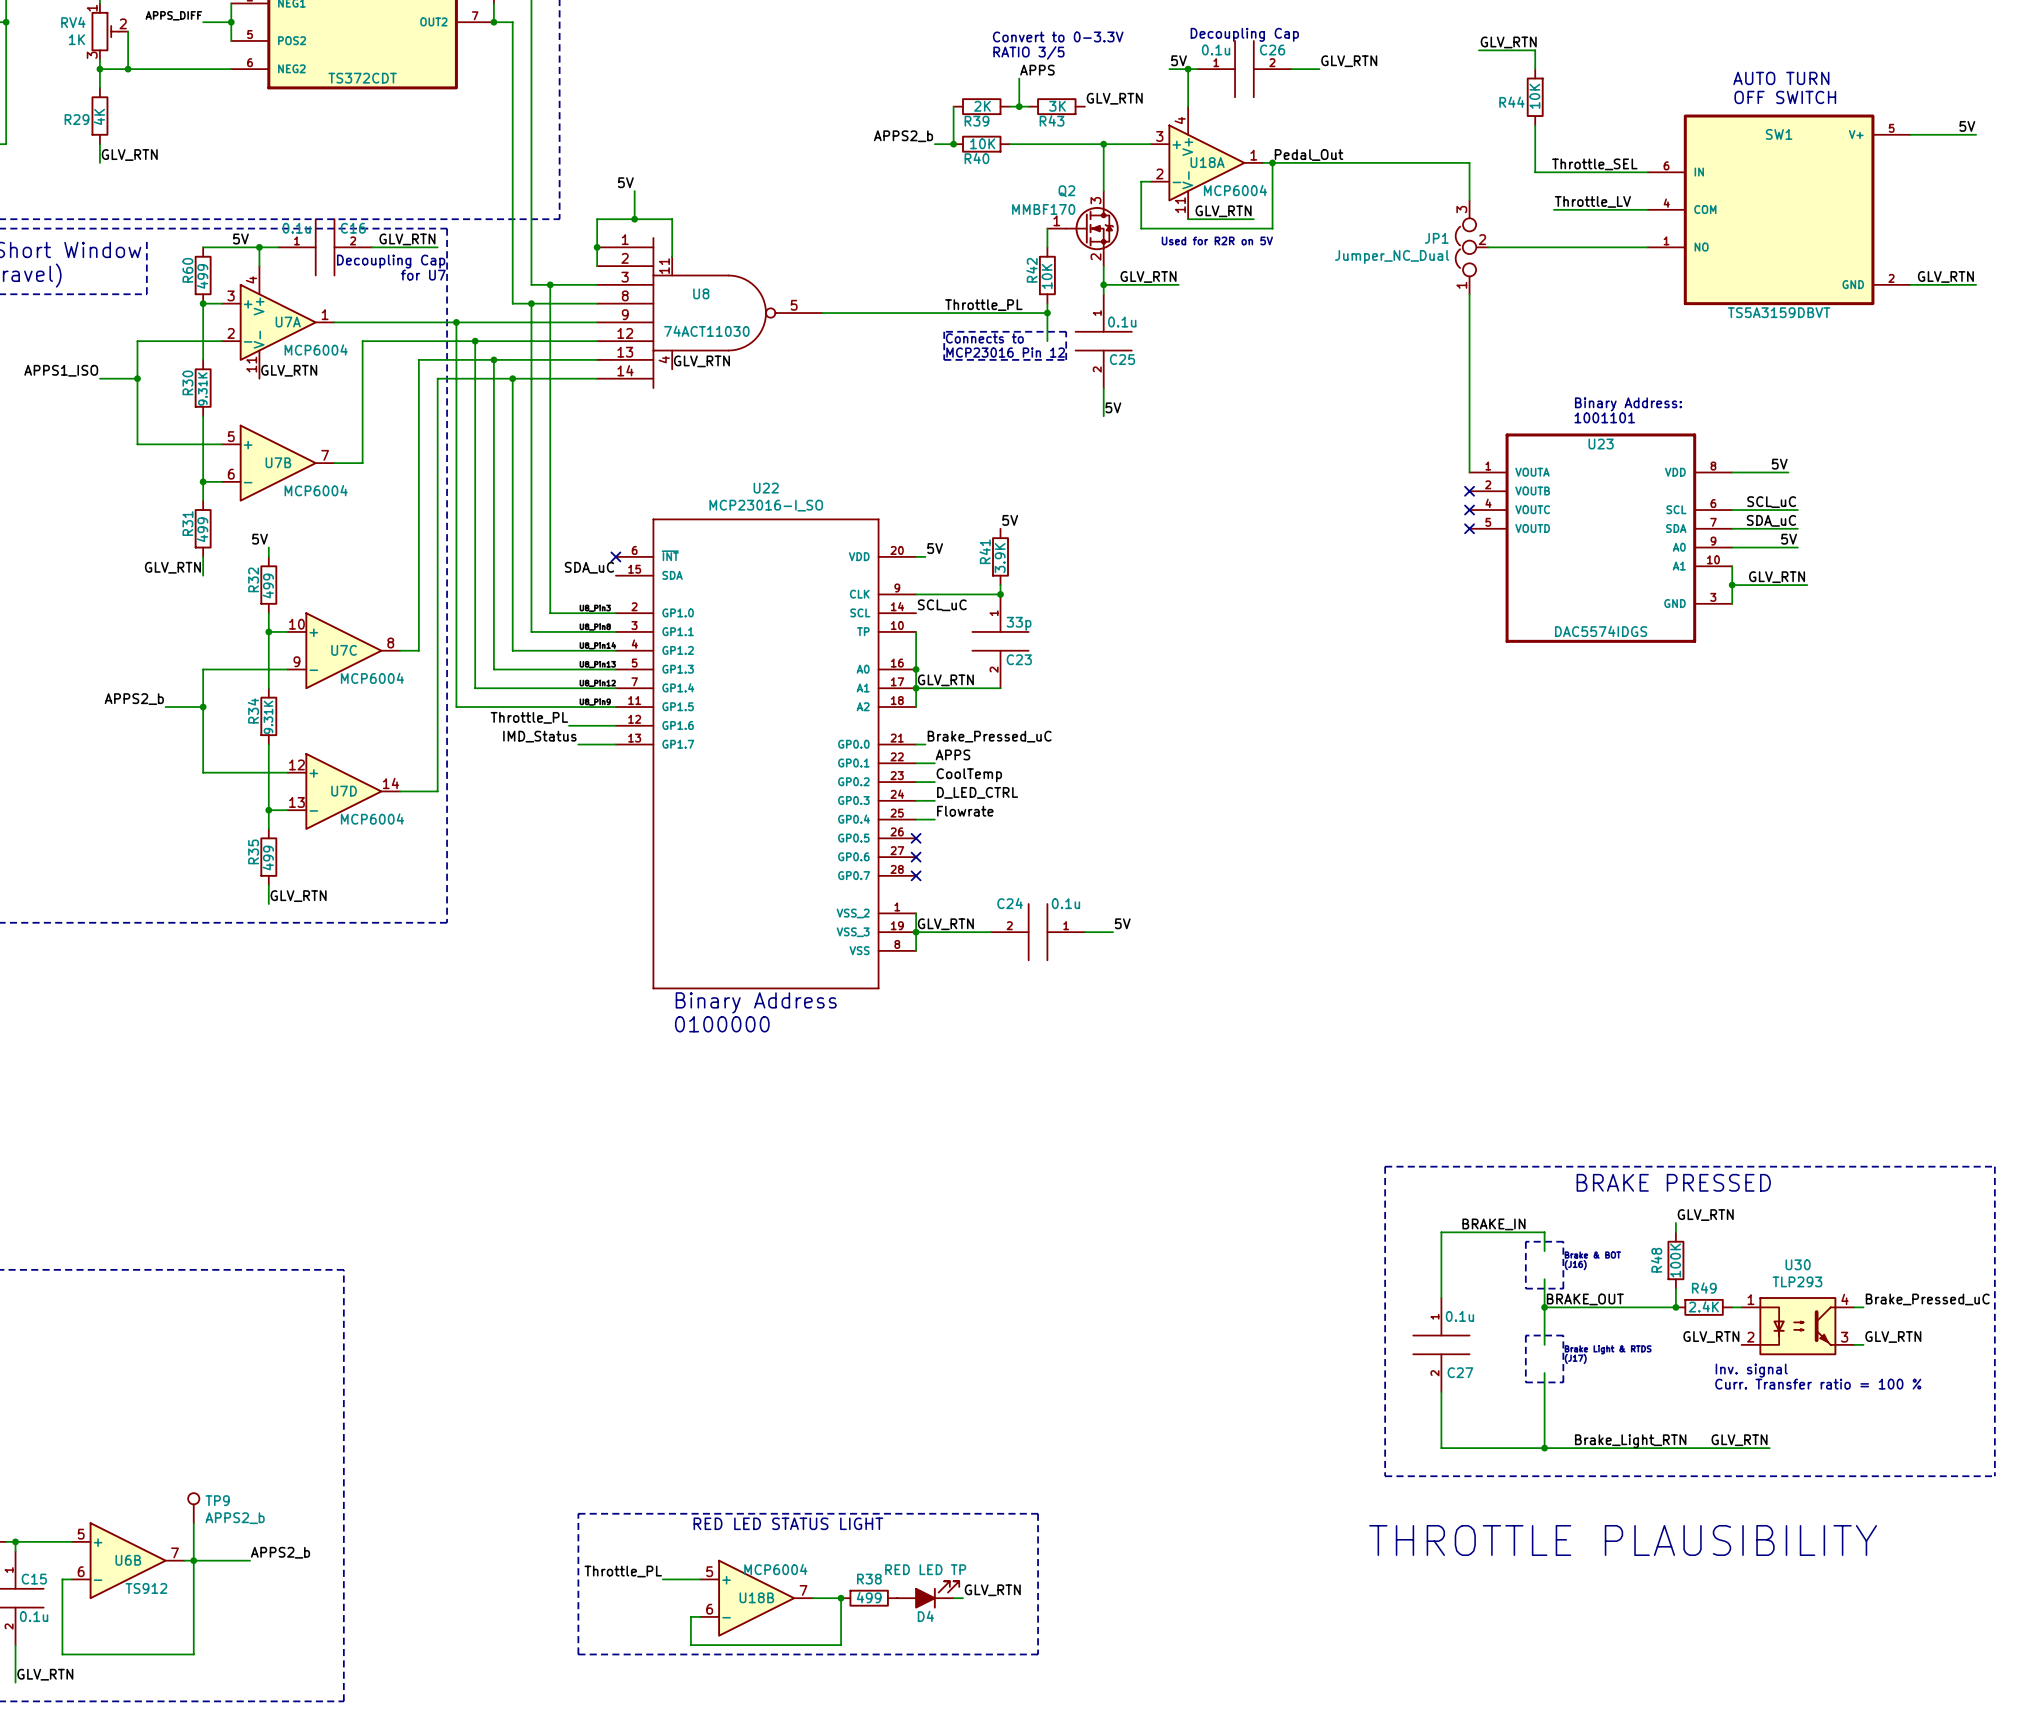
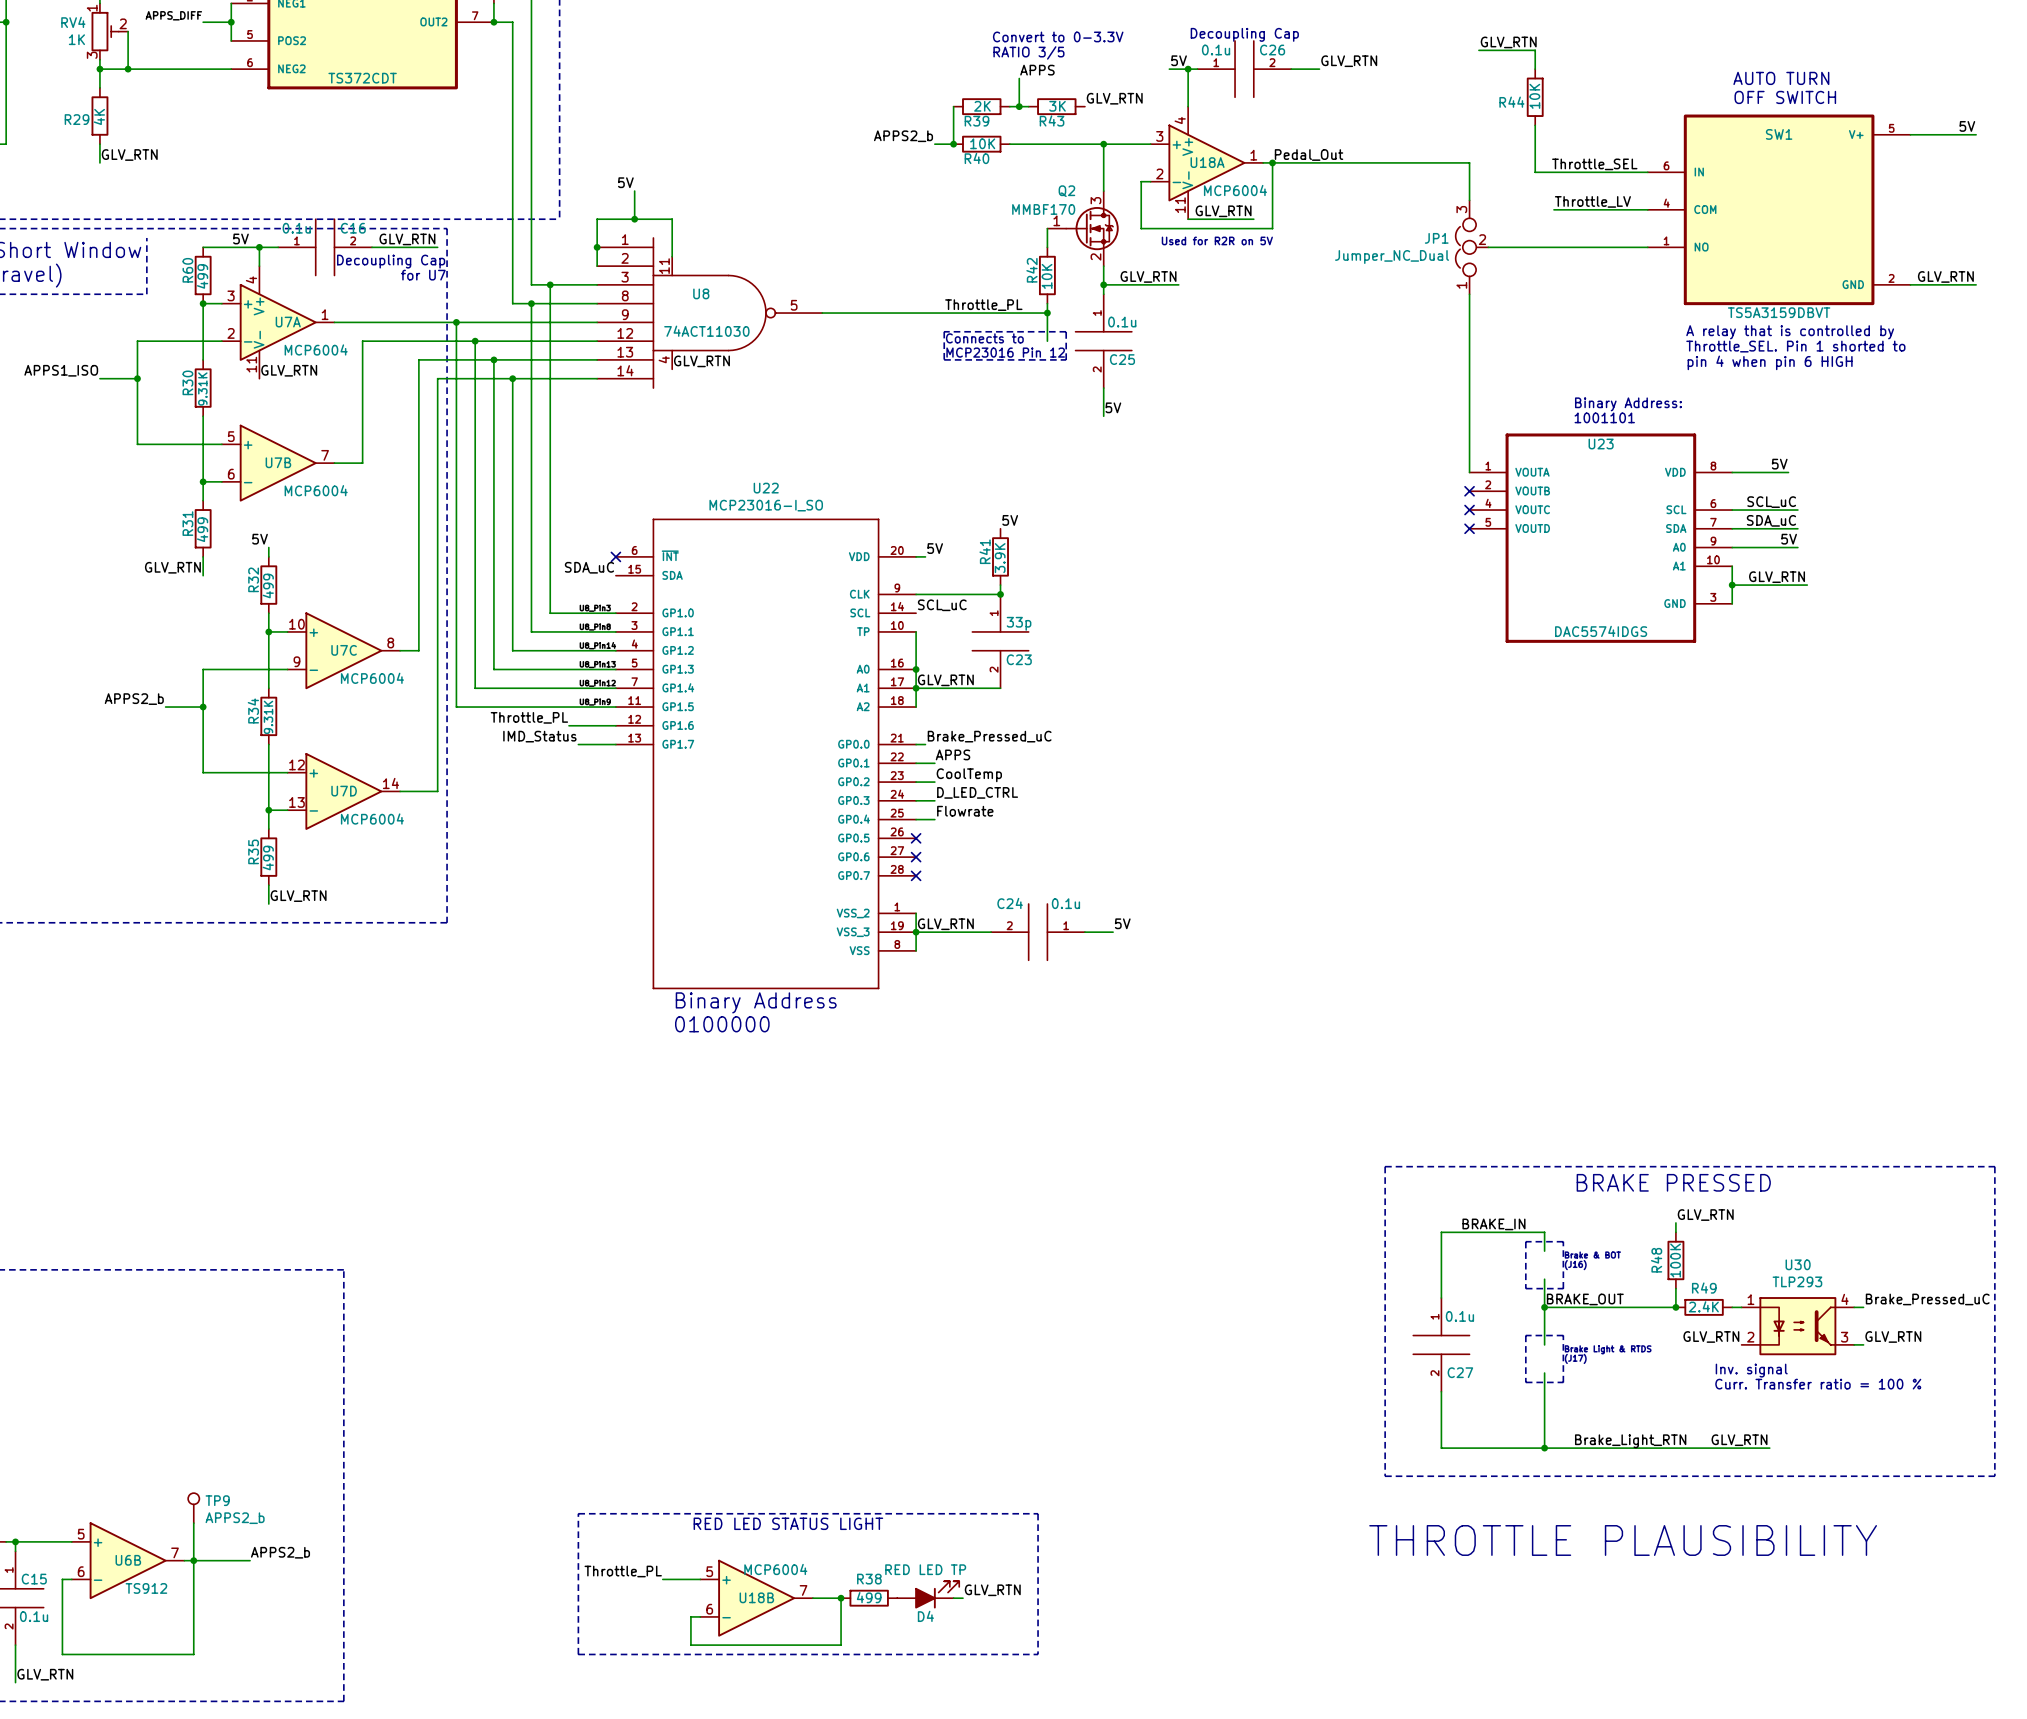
text: none -> A relay that is controlled by (1790, 332)
text: none -> Throttle_SEL. Pin 1 shorted to (1795, 346)
text: none -> pin 4 when pin 6 HIGH (1770, 362)

